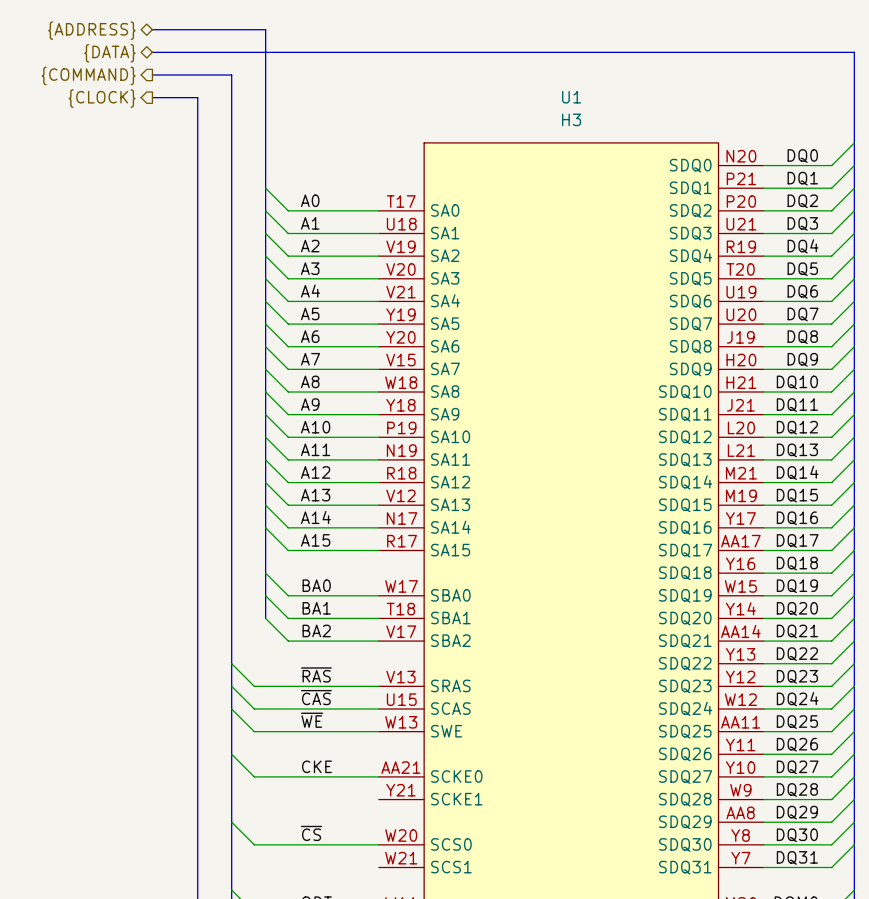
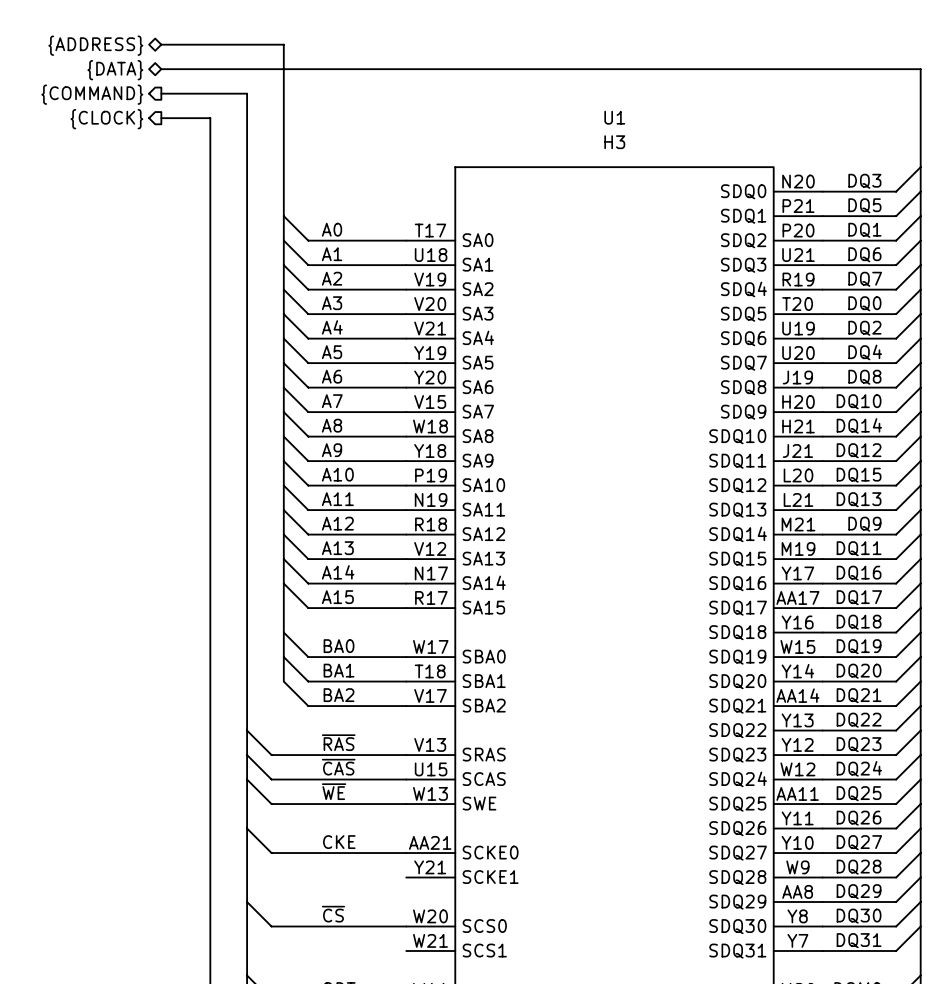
label: DQ0 (802, 156) -> DQ3 (864, 181)
label: DQ1 (802, 178) -> DQ5 (864, 205)
label: DQ2 (802, 201) -> DQ1 (864, 230)
label: DQ3 (802, 223) -> DQ6 (864, 254)
label: DQ4 (803, 246) -> DQ7 (865, 279)
label: DQ5 (802, 269) -> DQ0 (864, 303)
label: DQ6 (802, 291) -> DQ2 (864, 328)
label: DQ7 (803, 314) -> DQ4 (865, 352)
label: DQ9 (802, 359) -> DQ10 (859, 401)
label: DQ10 (797, 382) -> DQ14 (859, 425)
label: DQ11 (797, 405) -> DQ12 (859, 450)
label: DQ12 (797, 427) -> DQ15 (859, 475)
label: DQ14 (797, 472) -> DQ9 (864, 524)
label: DQ15 (797, 495) -> DQ11 (859, 548)

